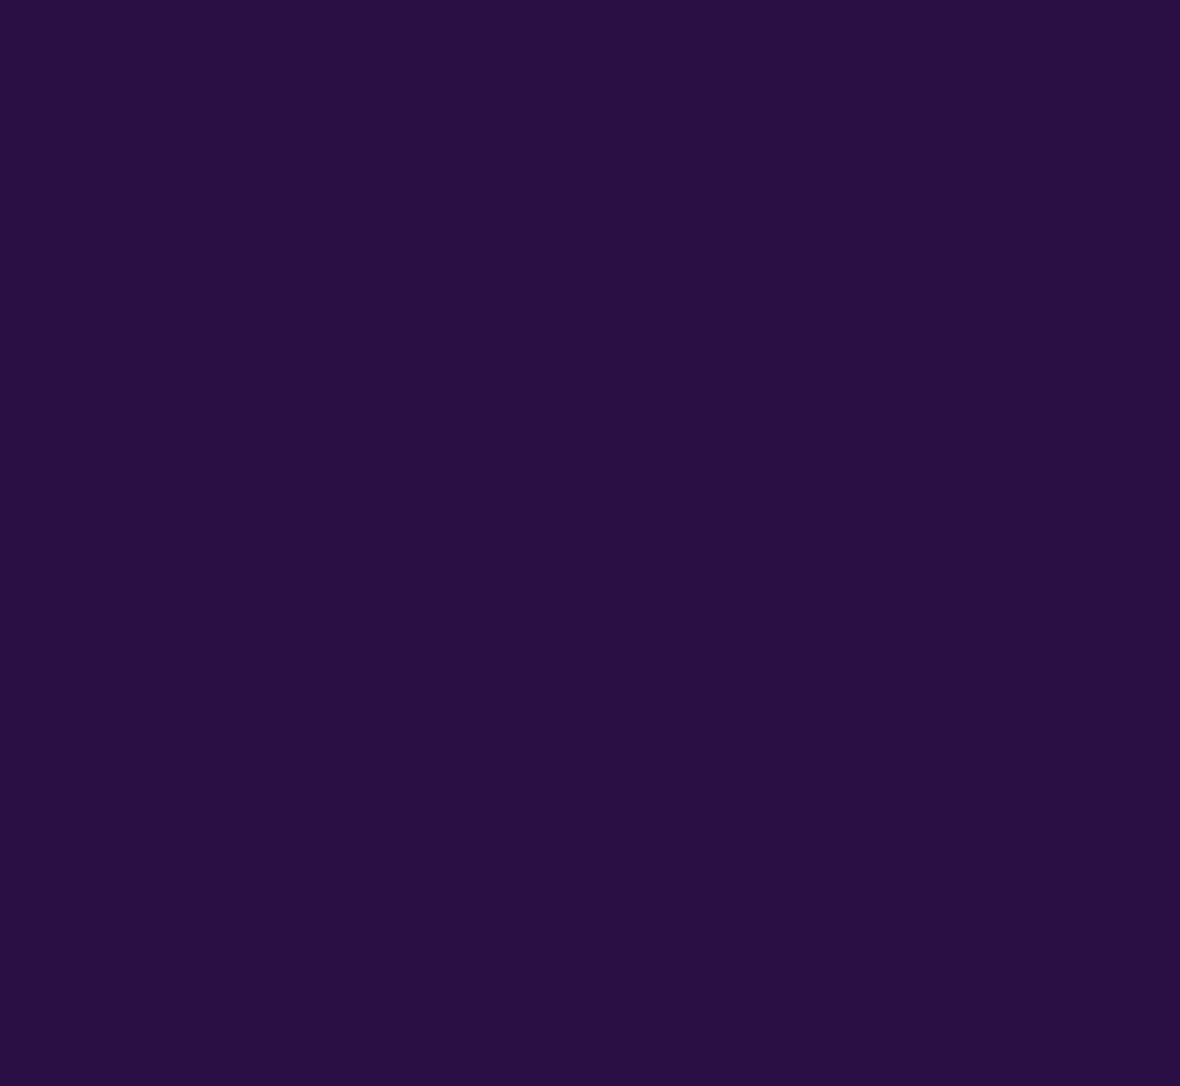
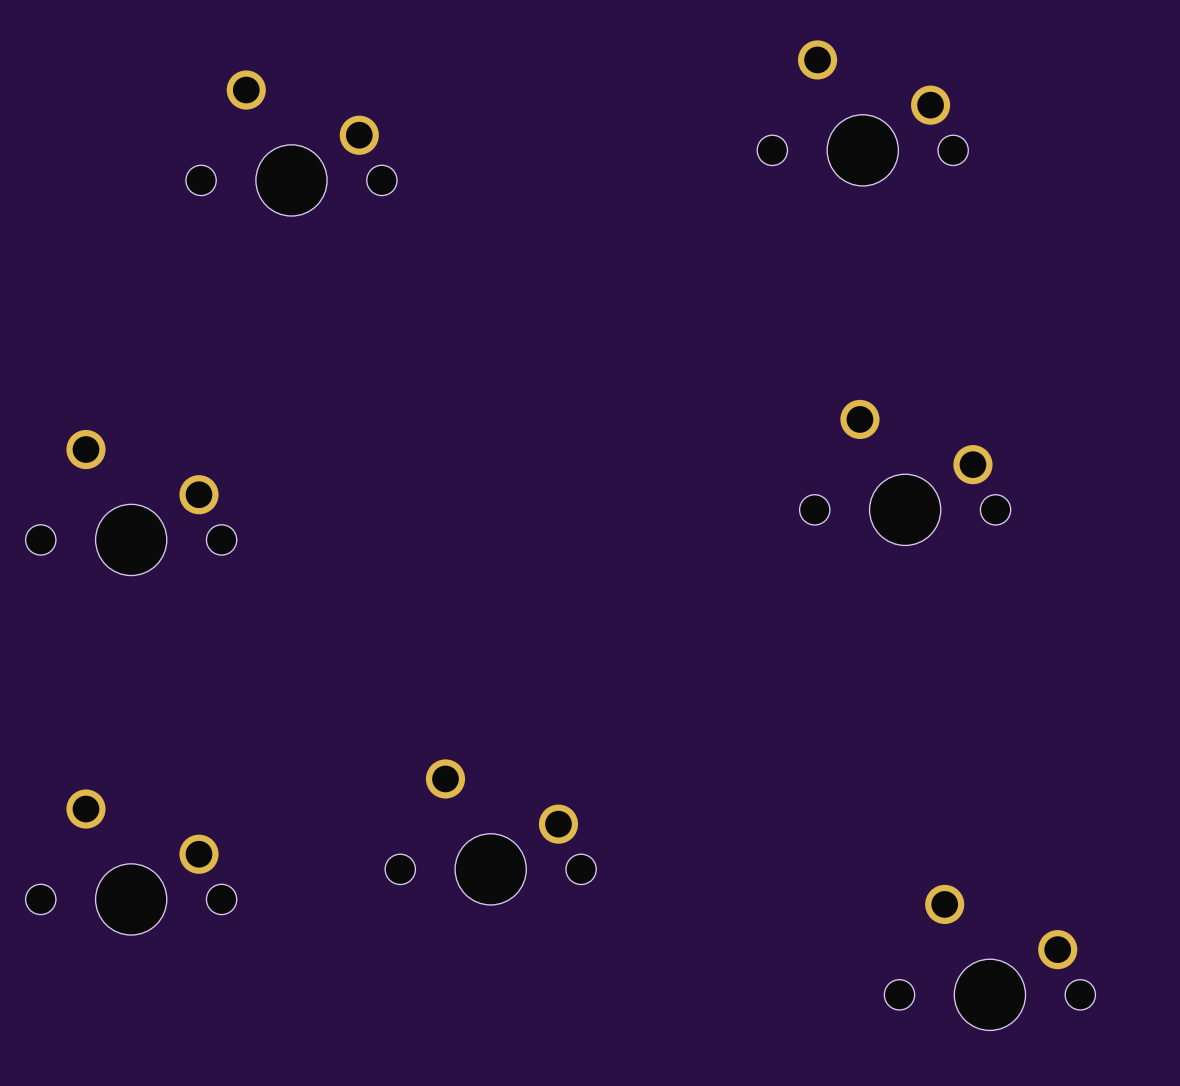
part: none -> (862, 113)
part: none -> (291, 143)
part: none -> (905, 472)
part: none -> (131, 502)
part: none -> (490, 832)
part: none -> (131, 862)
part: none -> (989, 957)

